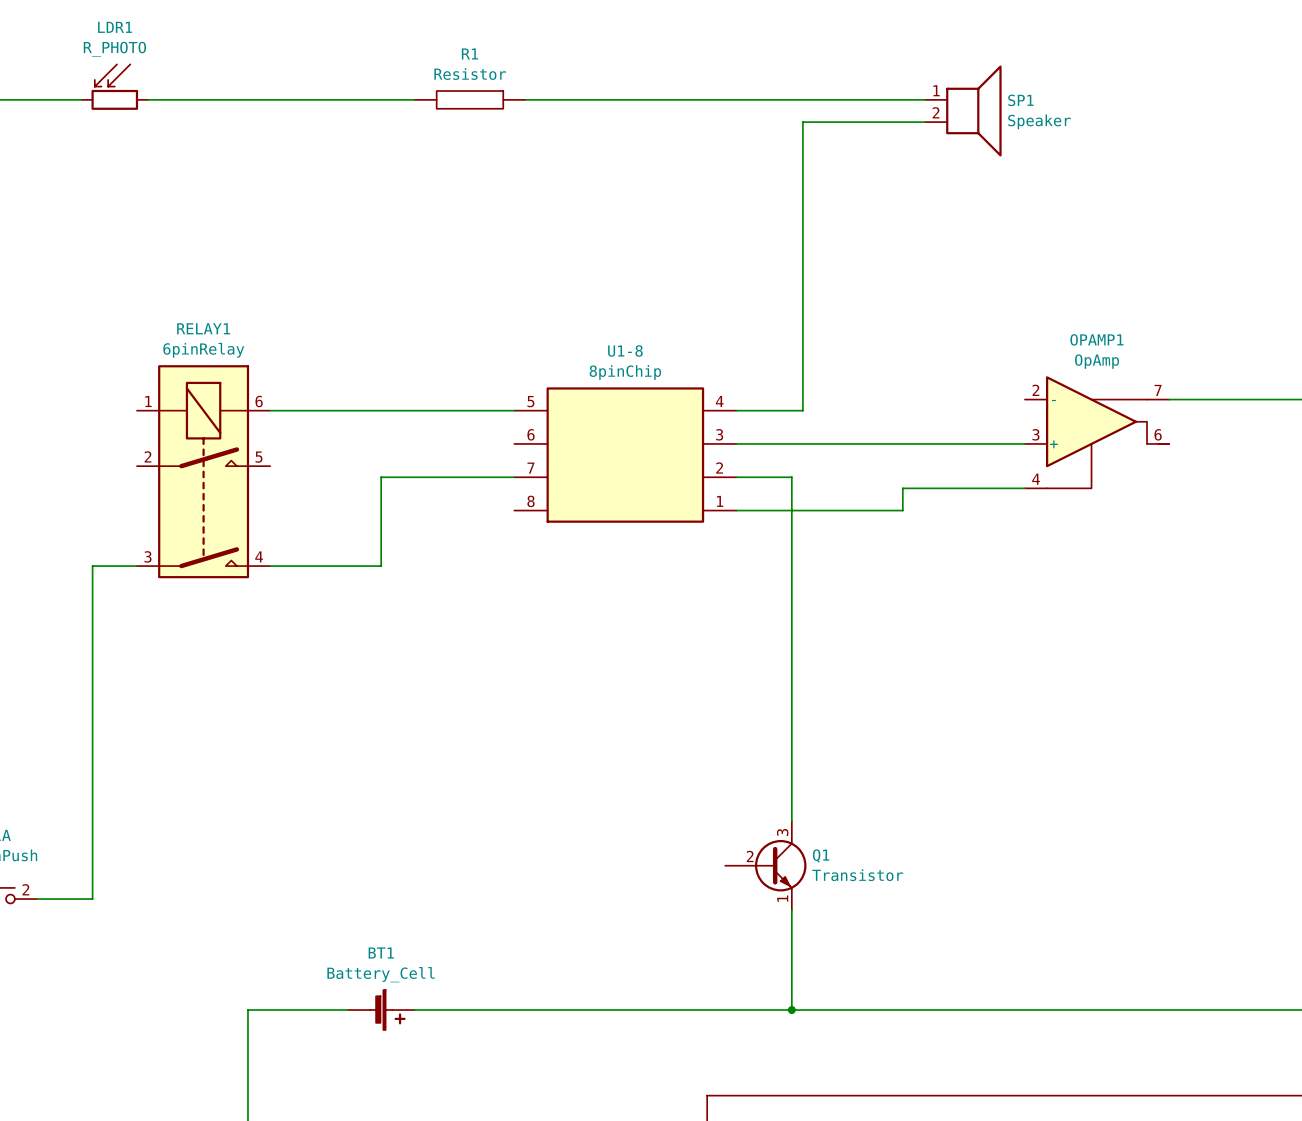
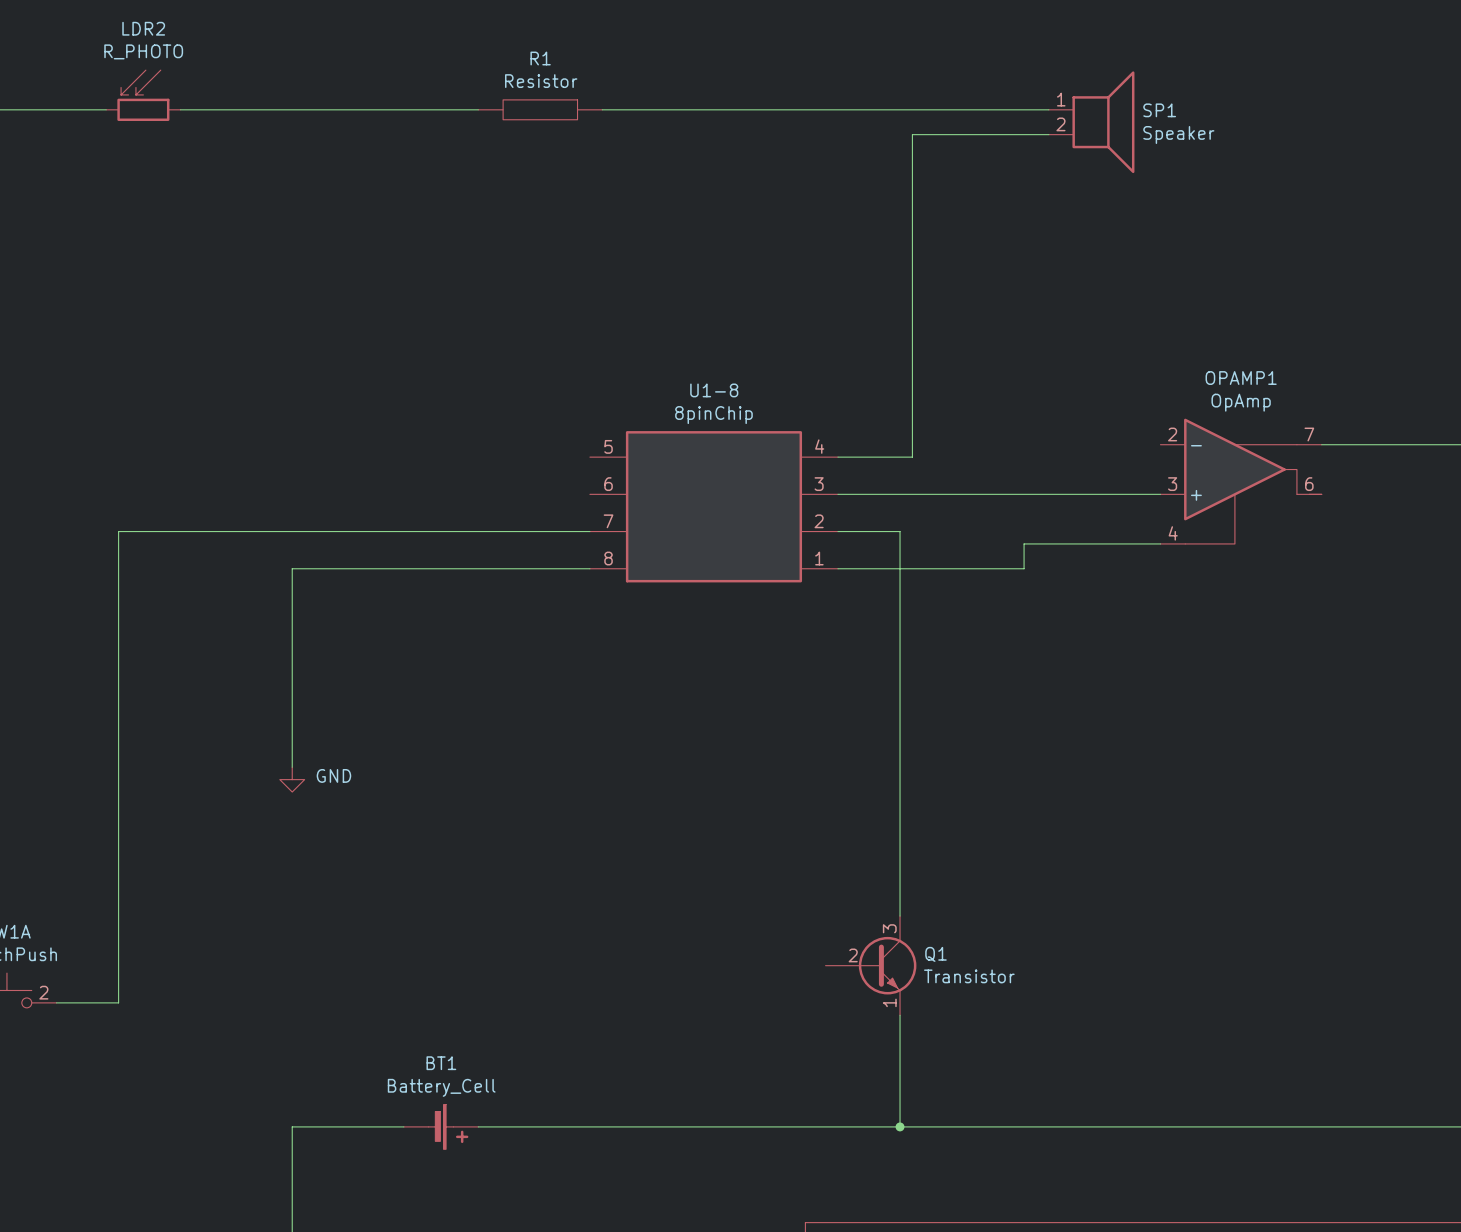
LDR1 name: LDR1 (115, 27) -> LDR2 (143, 28)
wire: (270, 410) (514, 410) -> none
RELAY1: 6pinRelay (203, 471) -> none
wire: (381, 477) (381, 566) (270, 566) -> (441, 531) (118, 531) (118, 630)
wire: none -> (589, 568) (292, 568) (292, 767)
wire: (92, 566) (136, 566) -> none
power symbol: none -> GND (292, 779)

